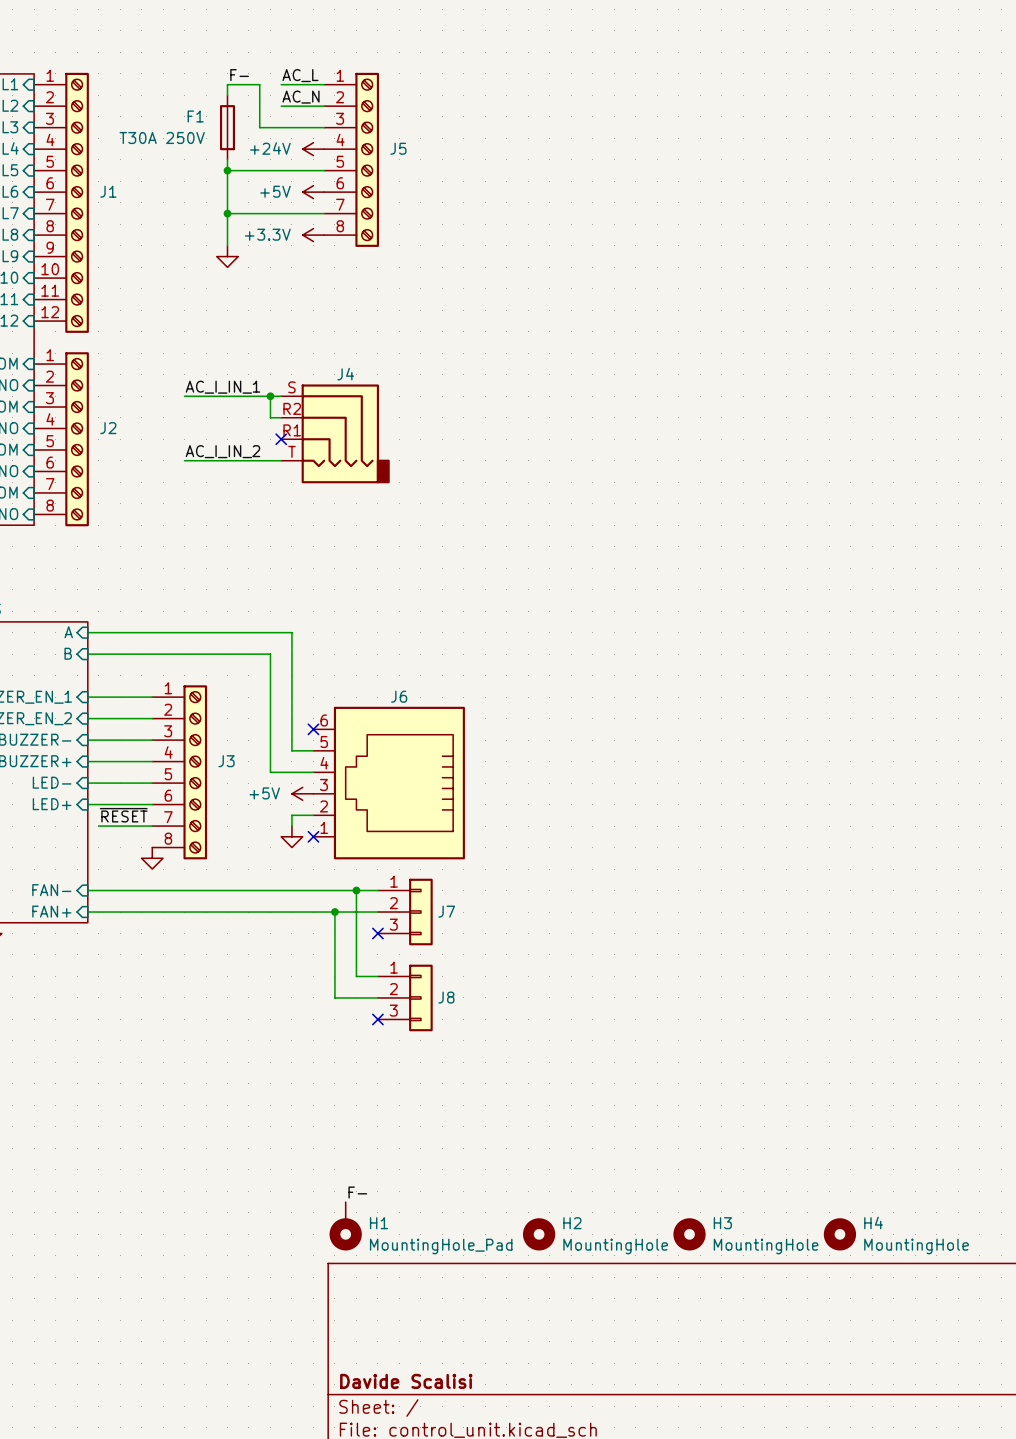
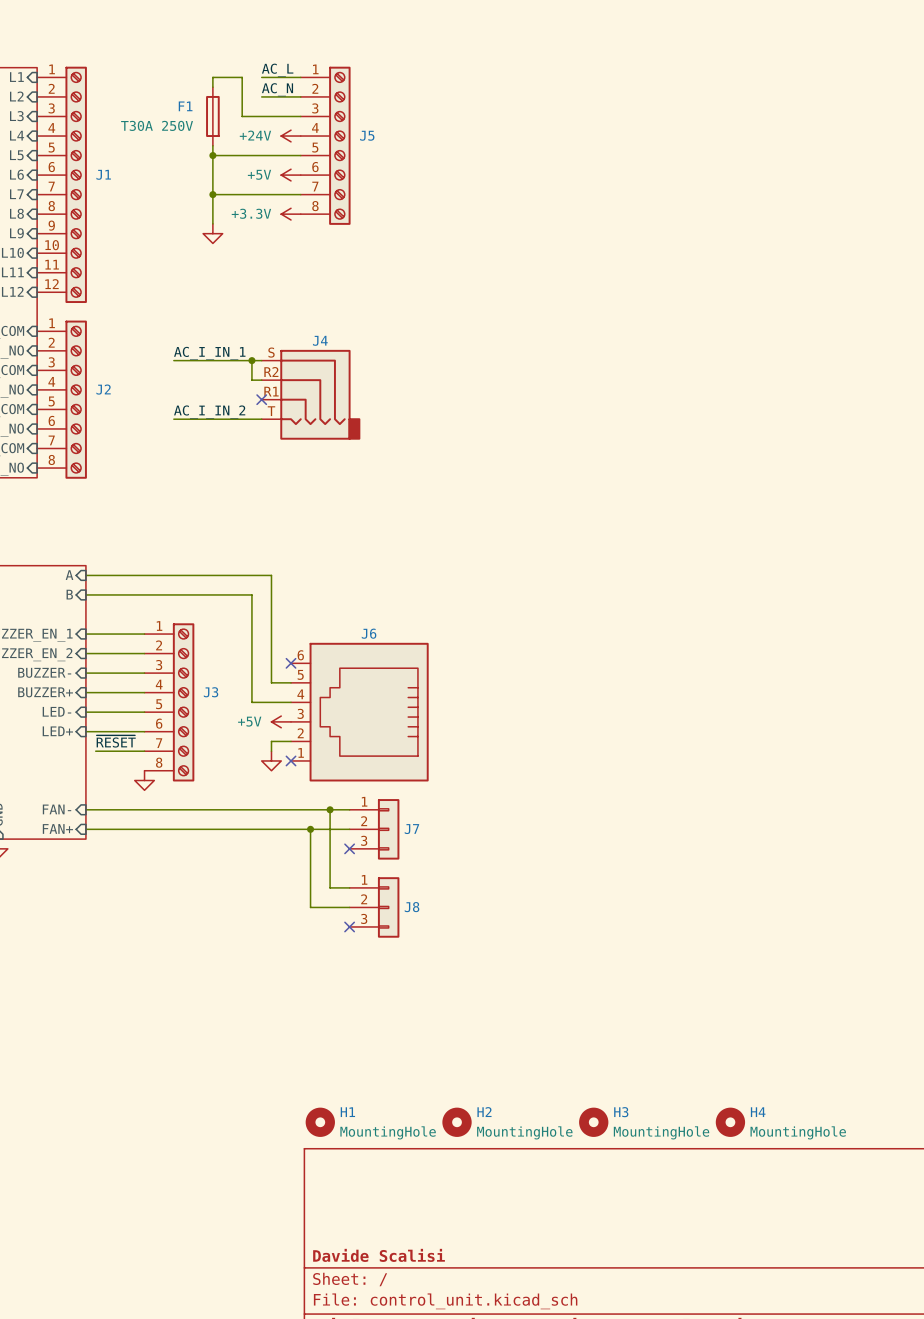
label: F- (239, 75) -> none
label: F- (357, 1192) -> none
H1 symbol: [329, 1202, 362, 1251] -> [305, 1107, 335, 1137]
H2 position: (539, 1234) -> (457, 1122)
H3 position: (689, 1234) -> (593, 1122)
H4 position: (839, 1234) -> (730, 1122)
H1 value: MountingHole_Pad (441, 1246) -> MountingHole (388, 1132)

